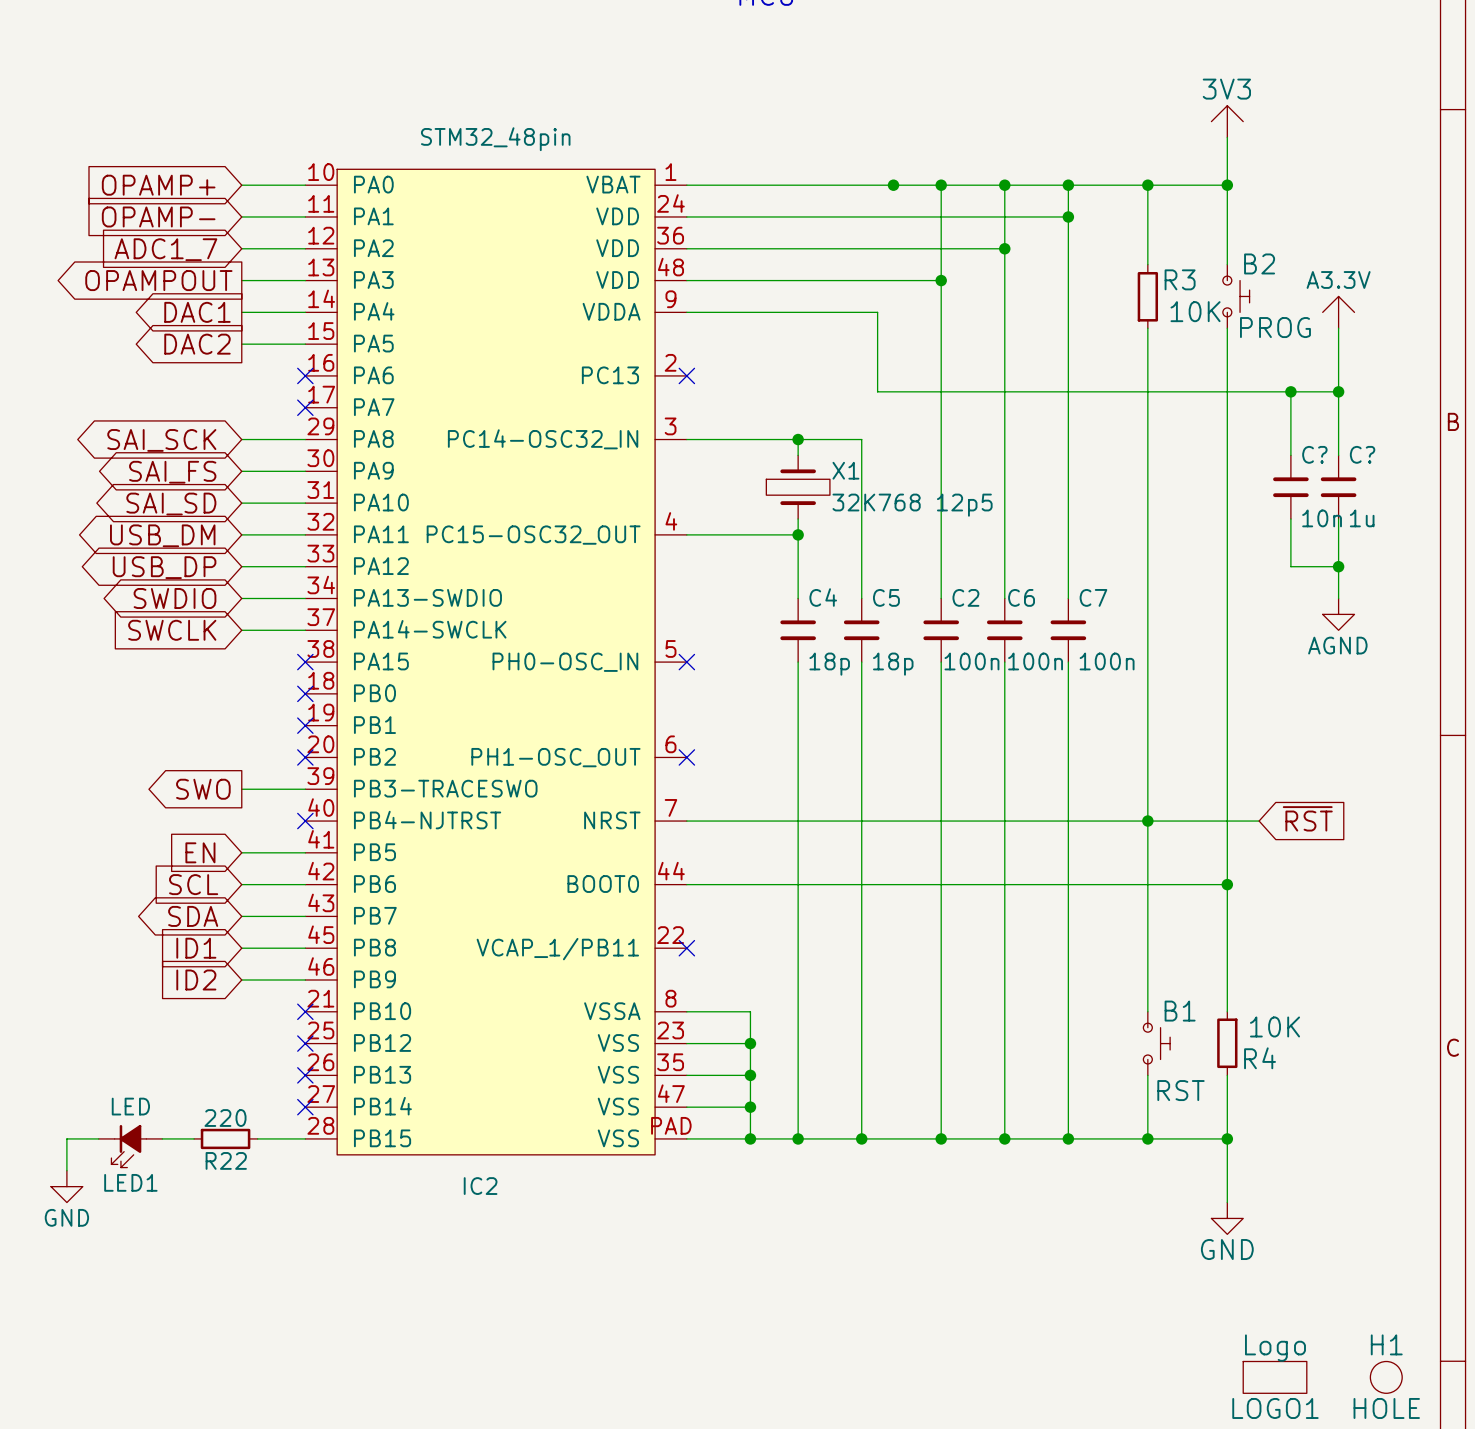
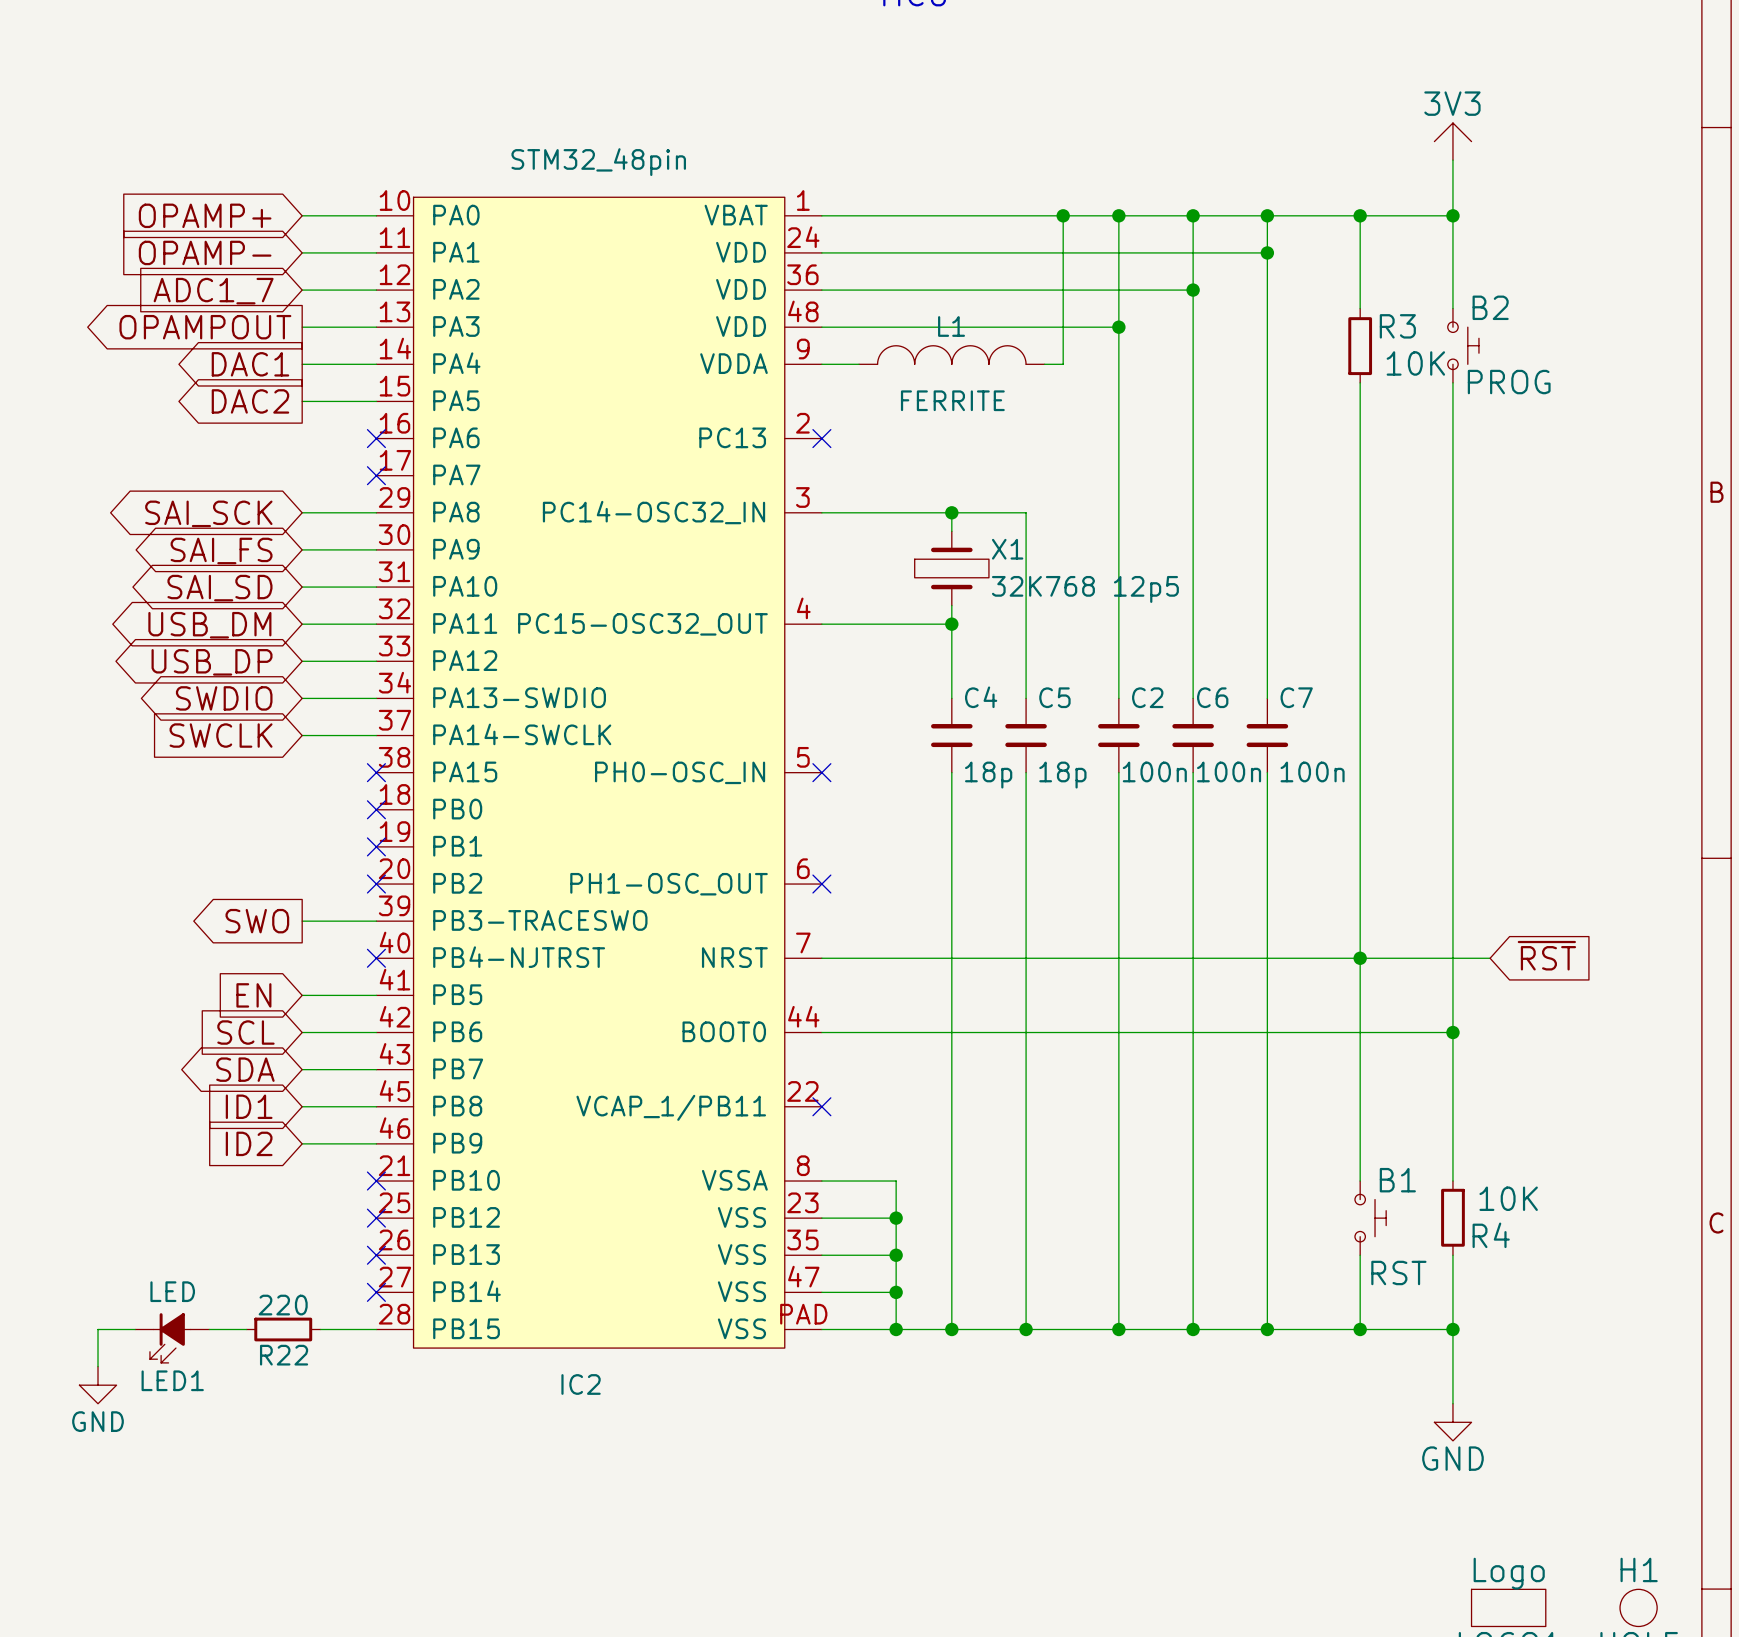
wire: none -> (1063, 215) (1063, 364) (1044, 364)
L1: none -> FERRITE (951, 355)
wire: (718, 312) (877, 312) (877, 391) (1338, 391) -> none
power symbol: A3.3V (1338, 312) -> none
wire: (1338, 328) (1338, 455) -> none
wire: (1290, 391) (1290, 455) -> none
junction: (1290, 391) -> none
junction: (1338, 391) -> none
C?: 10n (1290, 487) -> none
C?: 1u (1338, 487) -> none
wire: (1290, 519) (1290, 566) (1338, 566) -> none
wire: (1338, 519) (1338, 598) -> none
junction: (1338, 566) -> none
power symbol: AGND (1338, 614) -> none

